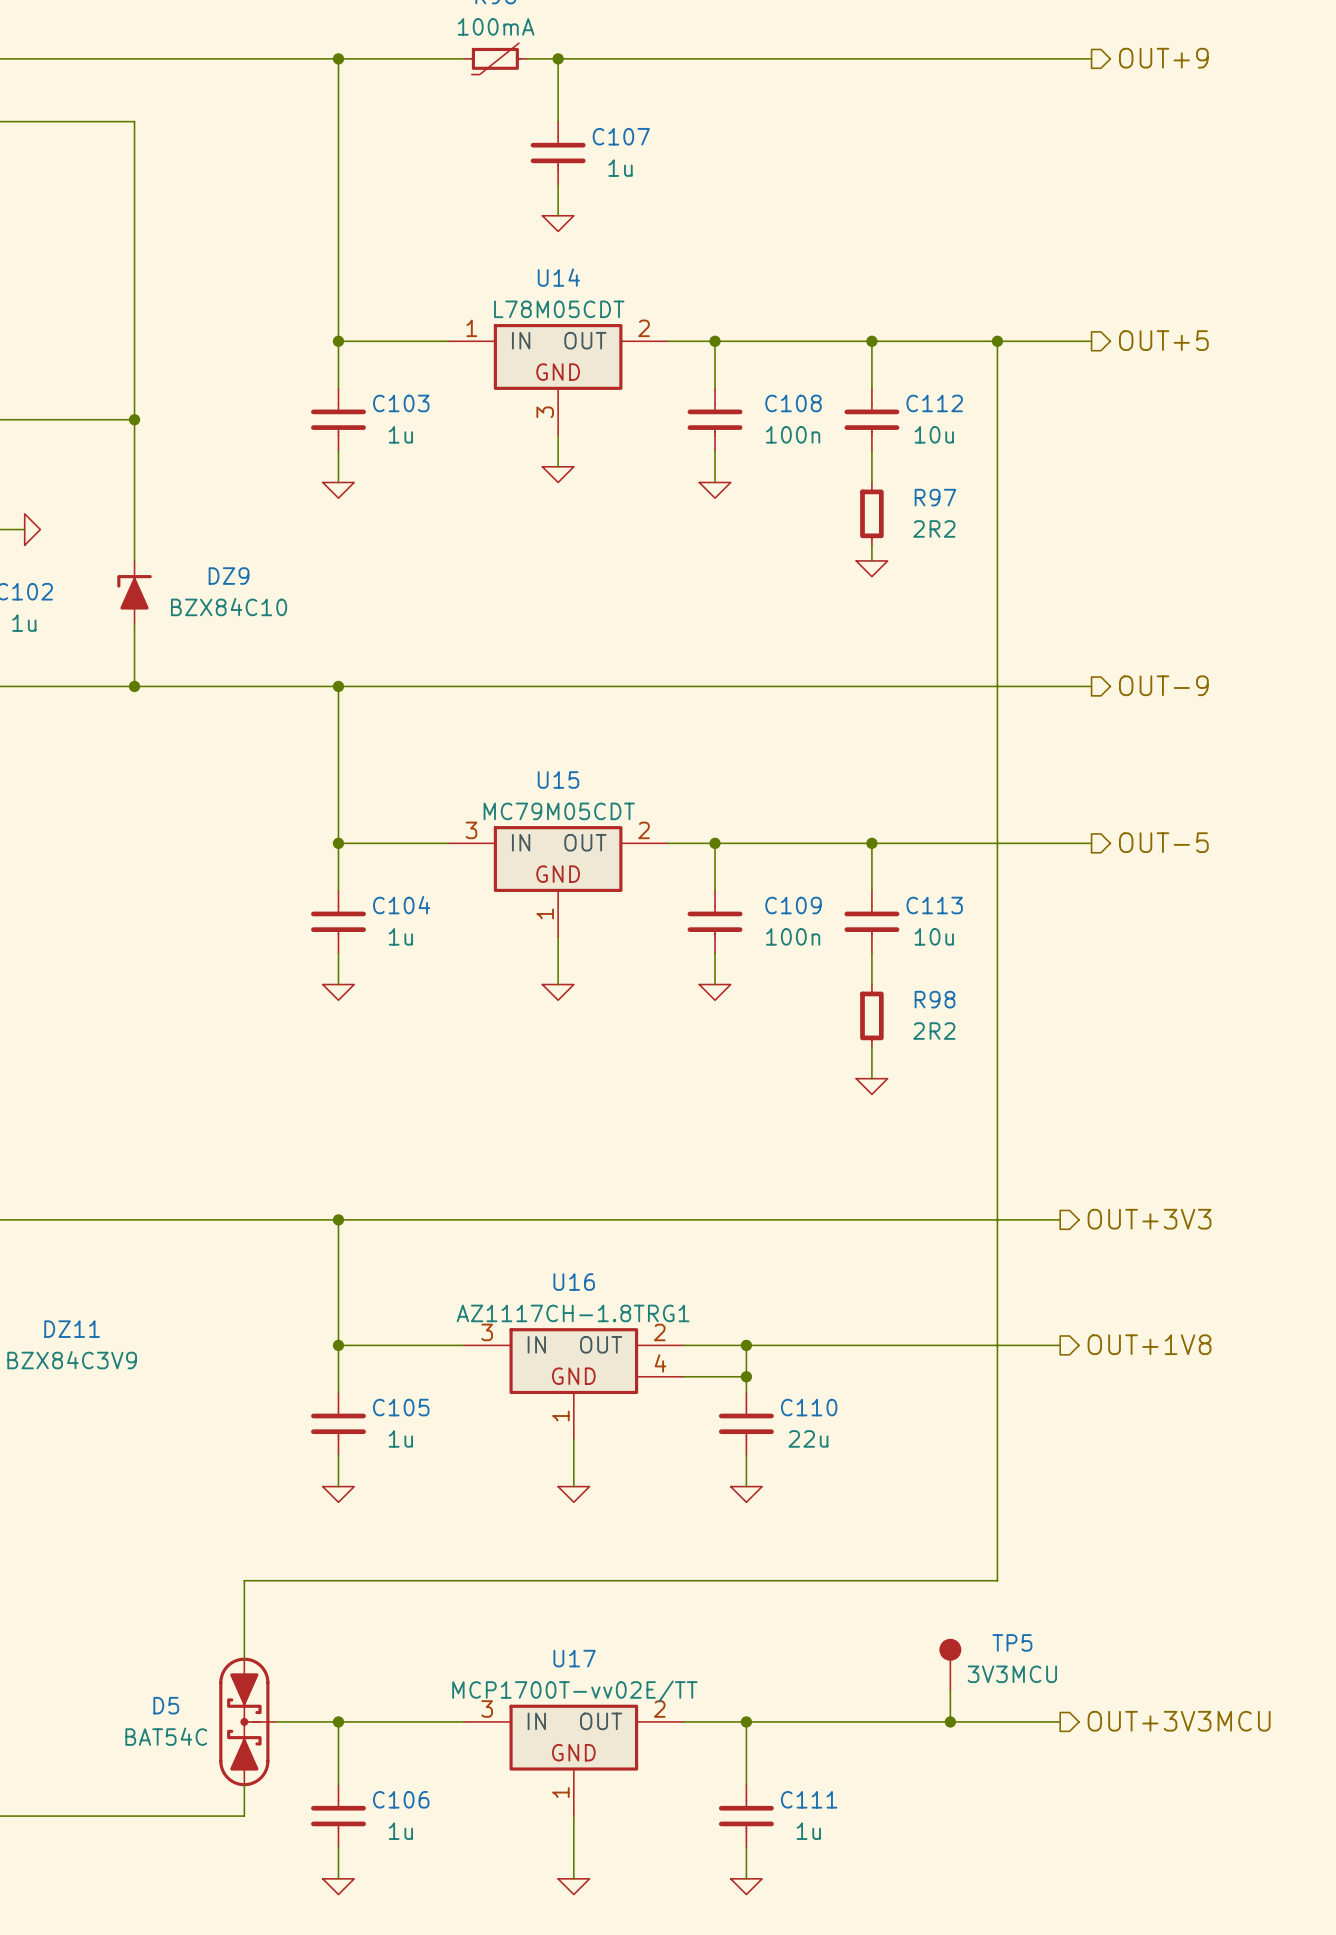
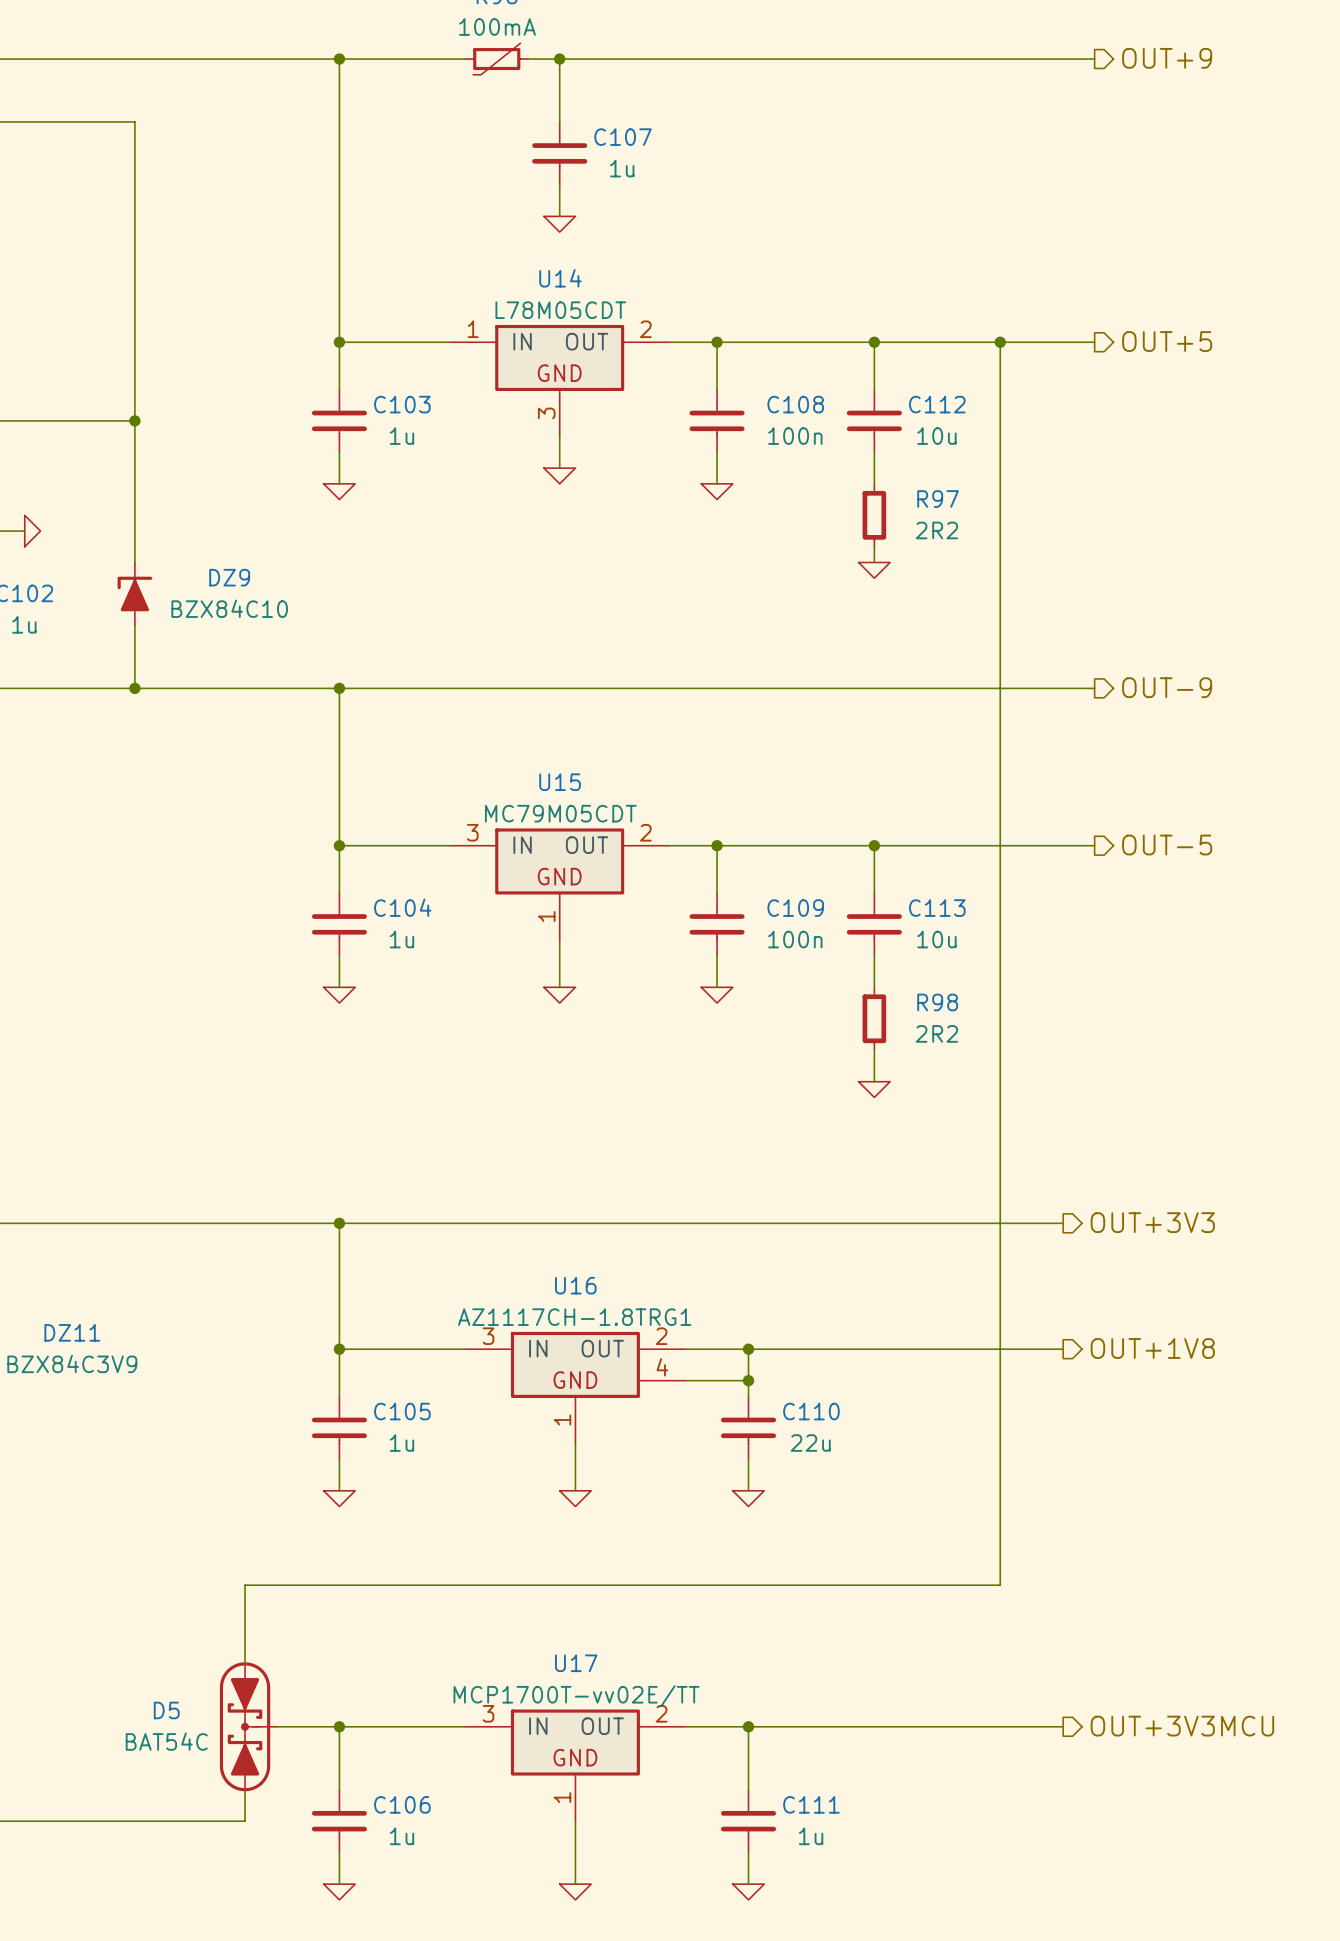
TP5: 3V3MCU (950, 1664) -> none
wire: (950, 1690) (950, 1721) -> none
junction: (950, 1721) -> none

